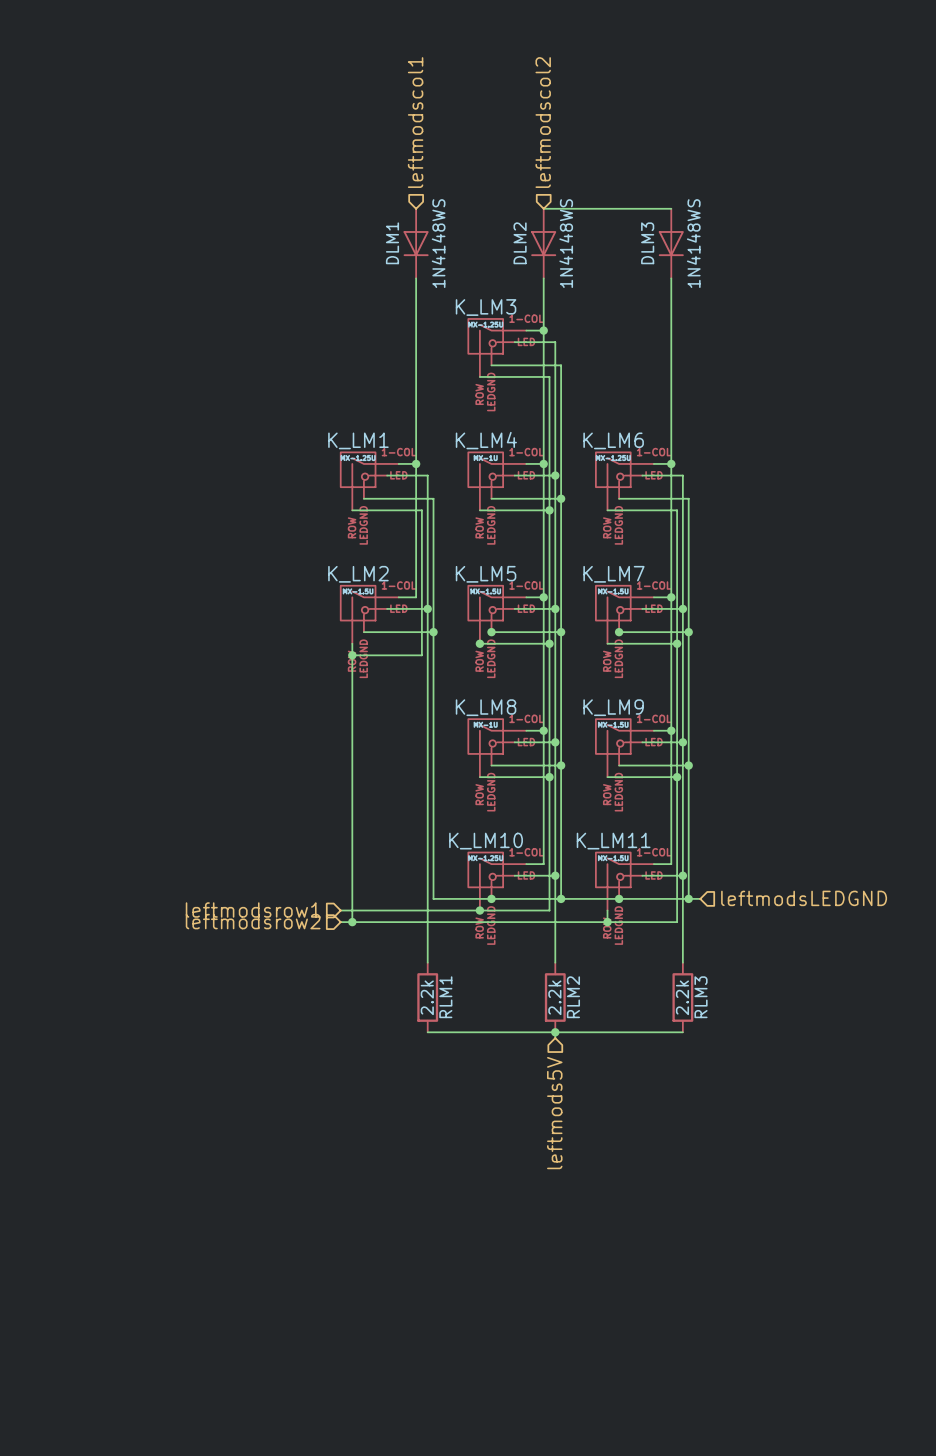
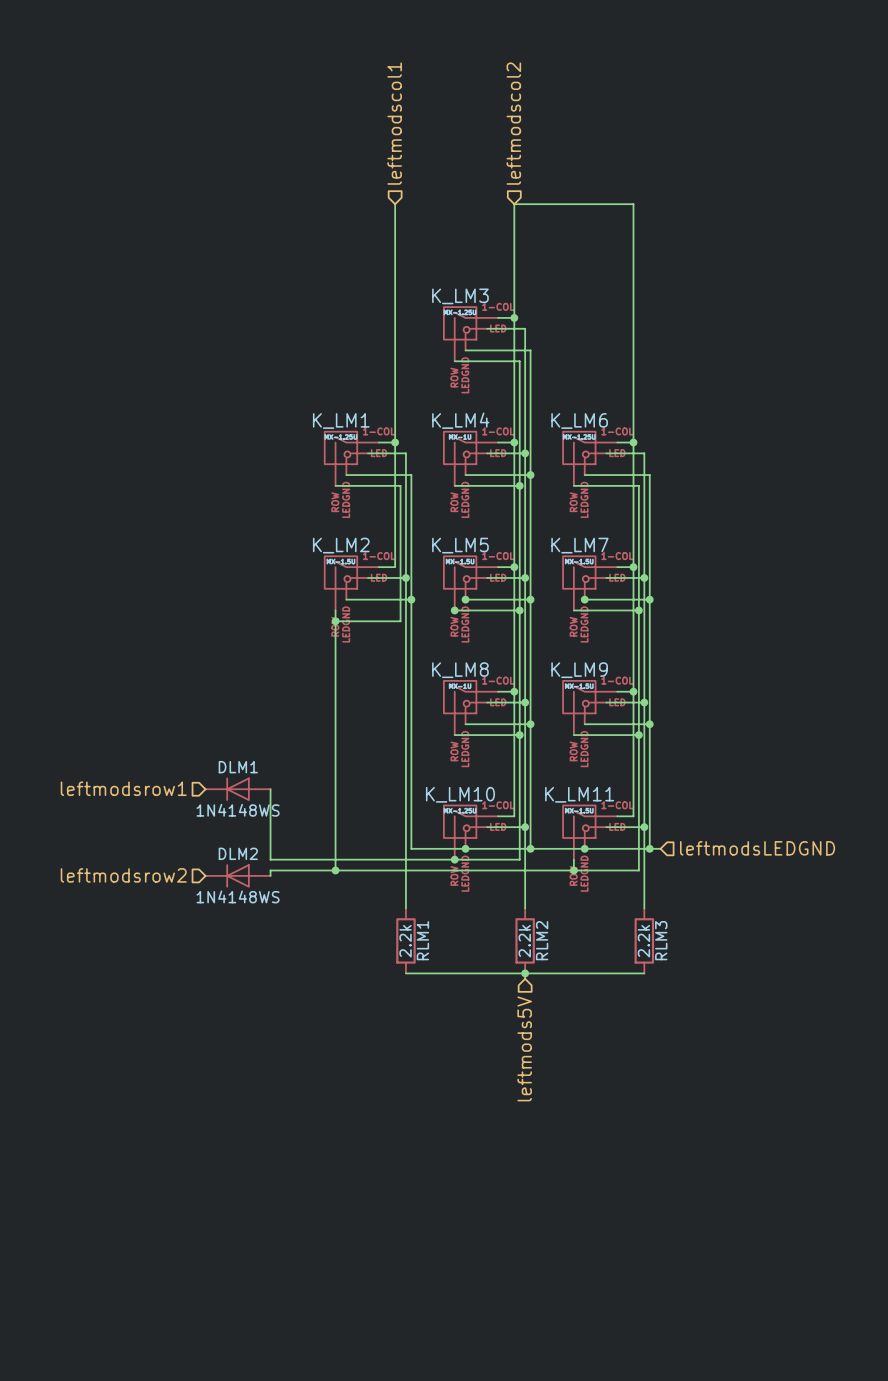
DLM1 rotation: 0° (416, 243) -> 90° clockwise (238, 789)
DLM1 position: (416, 243) -> (238, 789)
DLM2 rotation: 0° (543, 243) -> 90° clockwise (238, 875)
DLM2 position: (543, 243) -> (238, 875)
DLM3: 1N4148WS (671, 243) -> none
wire: none -> (270, 789) (270, 859) (324, 859)
hierarchical label position: leftmodsrow1 (253, 910) -> leftmodsrow1 (123, 788)
hierarchical label position: leftmodsrow2 (253, 921) -> leftmodsrow2 (123, 875)
wire: none -> (324, 870) (270, 870) (270, 875)

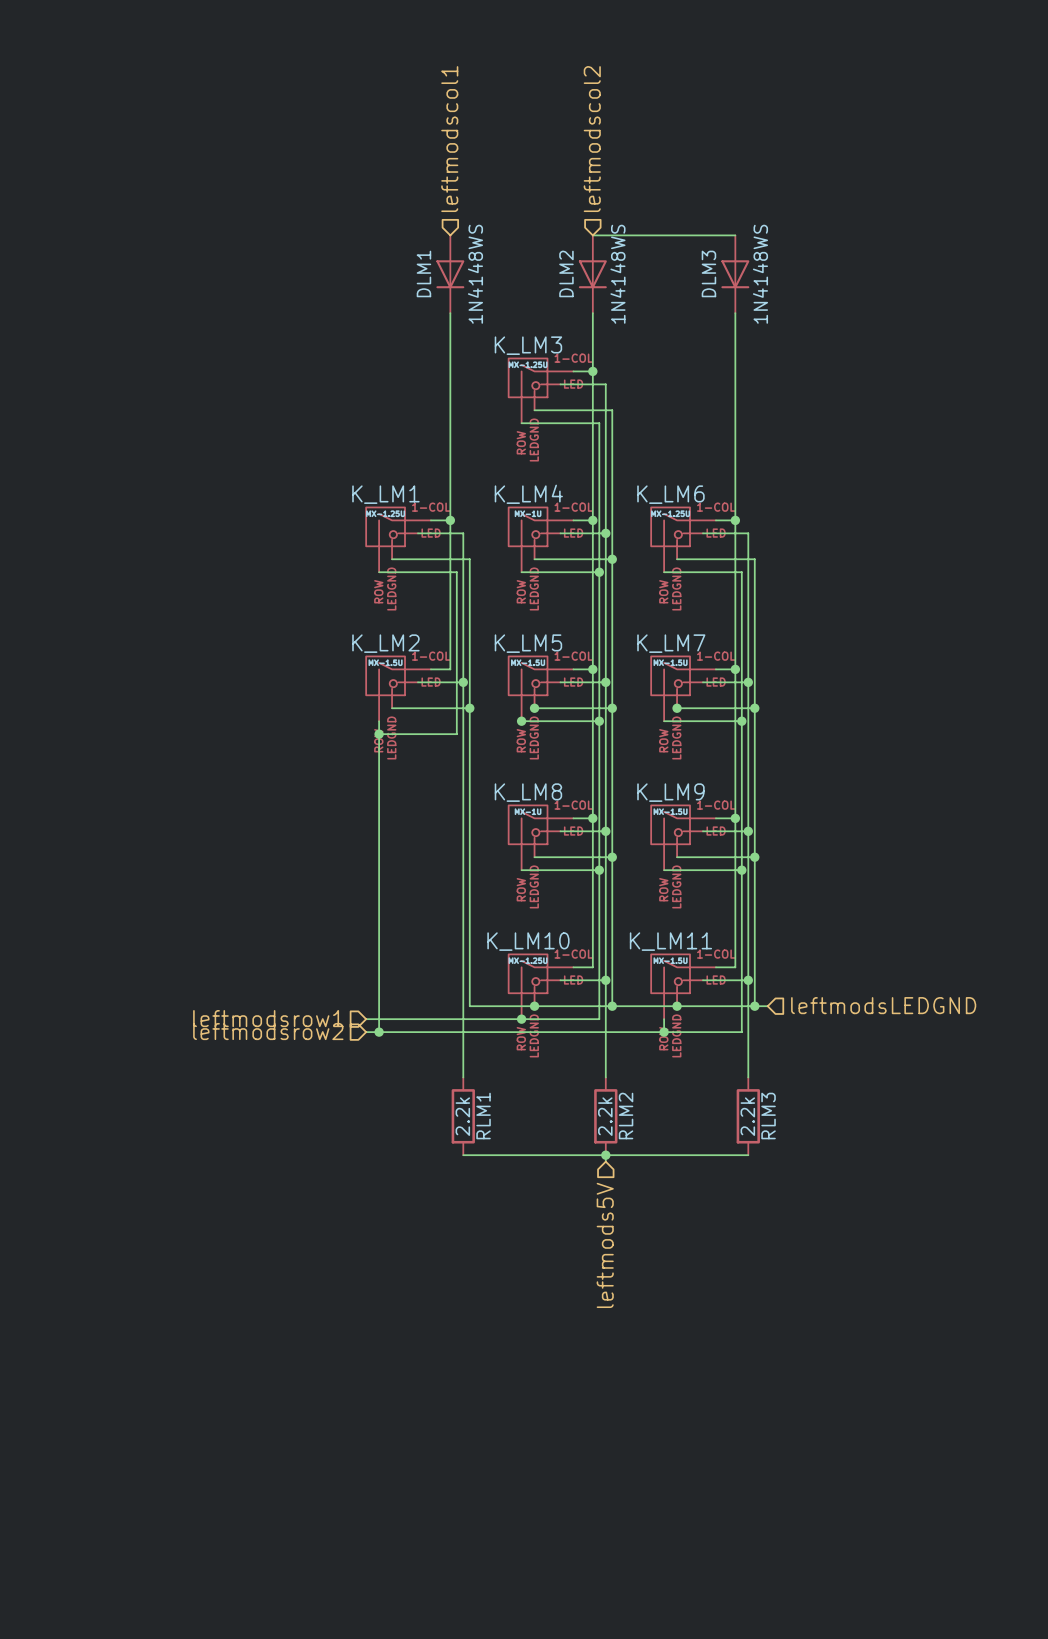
DLM3: none -> 1N4148WS (735, 274)
hierarchical label position: leftmodsrow1 (123, 788) -> leftmodsrow1 (268, 1018)
DLM1 rotation: 0° (238, 789) -> 90° counterclockwise (450, 274)
DLM1 position: (238, 789) -> (450, 274)
wire: (270, 789) (270, 859) (324, 859) -> none
wire: (324, 870) (270, 870) (270, 875) -> none
hierarchical label position: leftmodsrow2 (123, 875) -> leftmodsrow2 (268, 1031)
DLM2 rotation: 0° (238, 875) -> 90° counterclockwise (592, 274)
DLM2 position: (238, 875) -> (592, 274)

